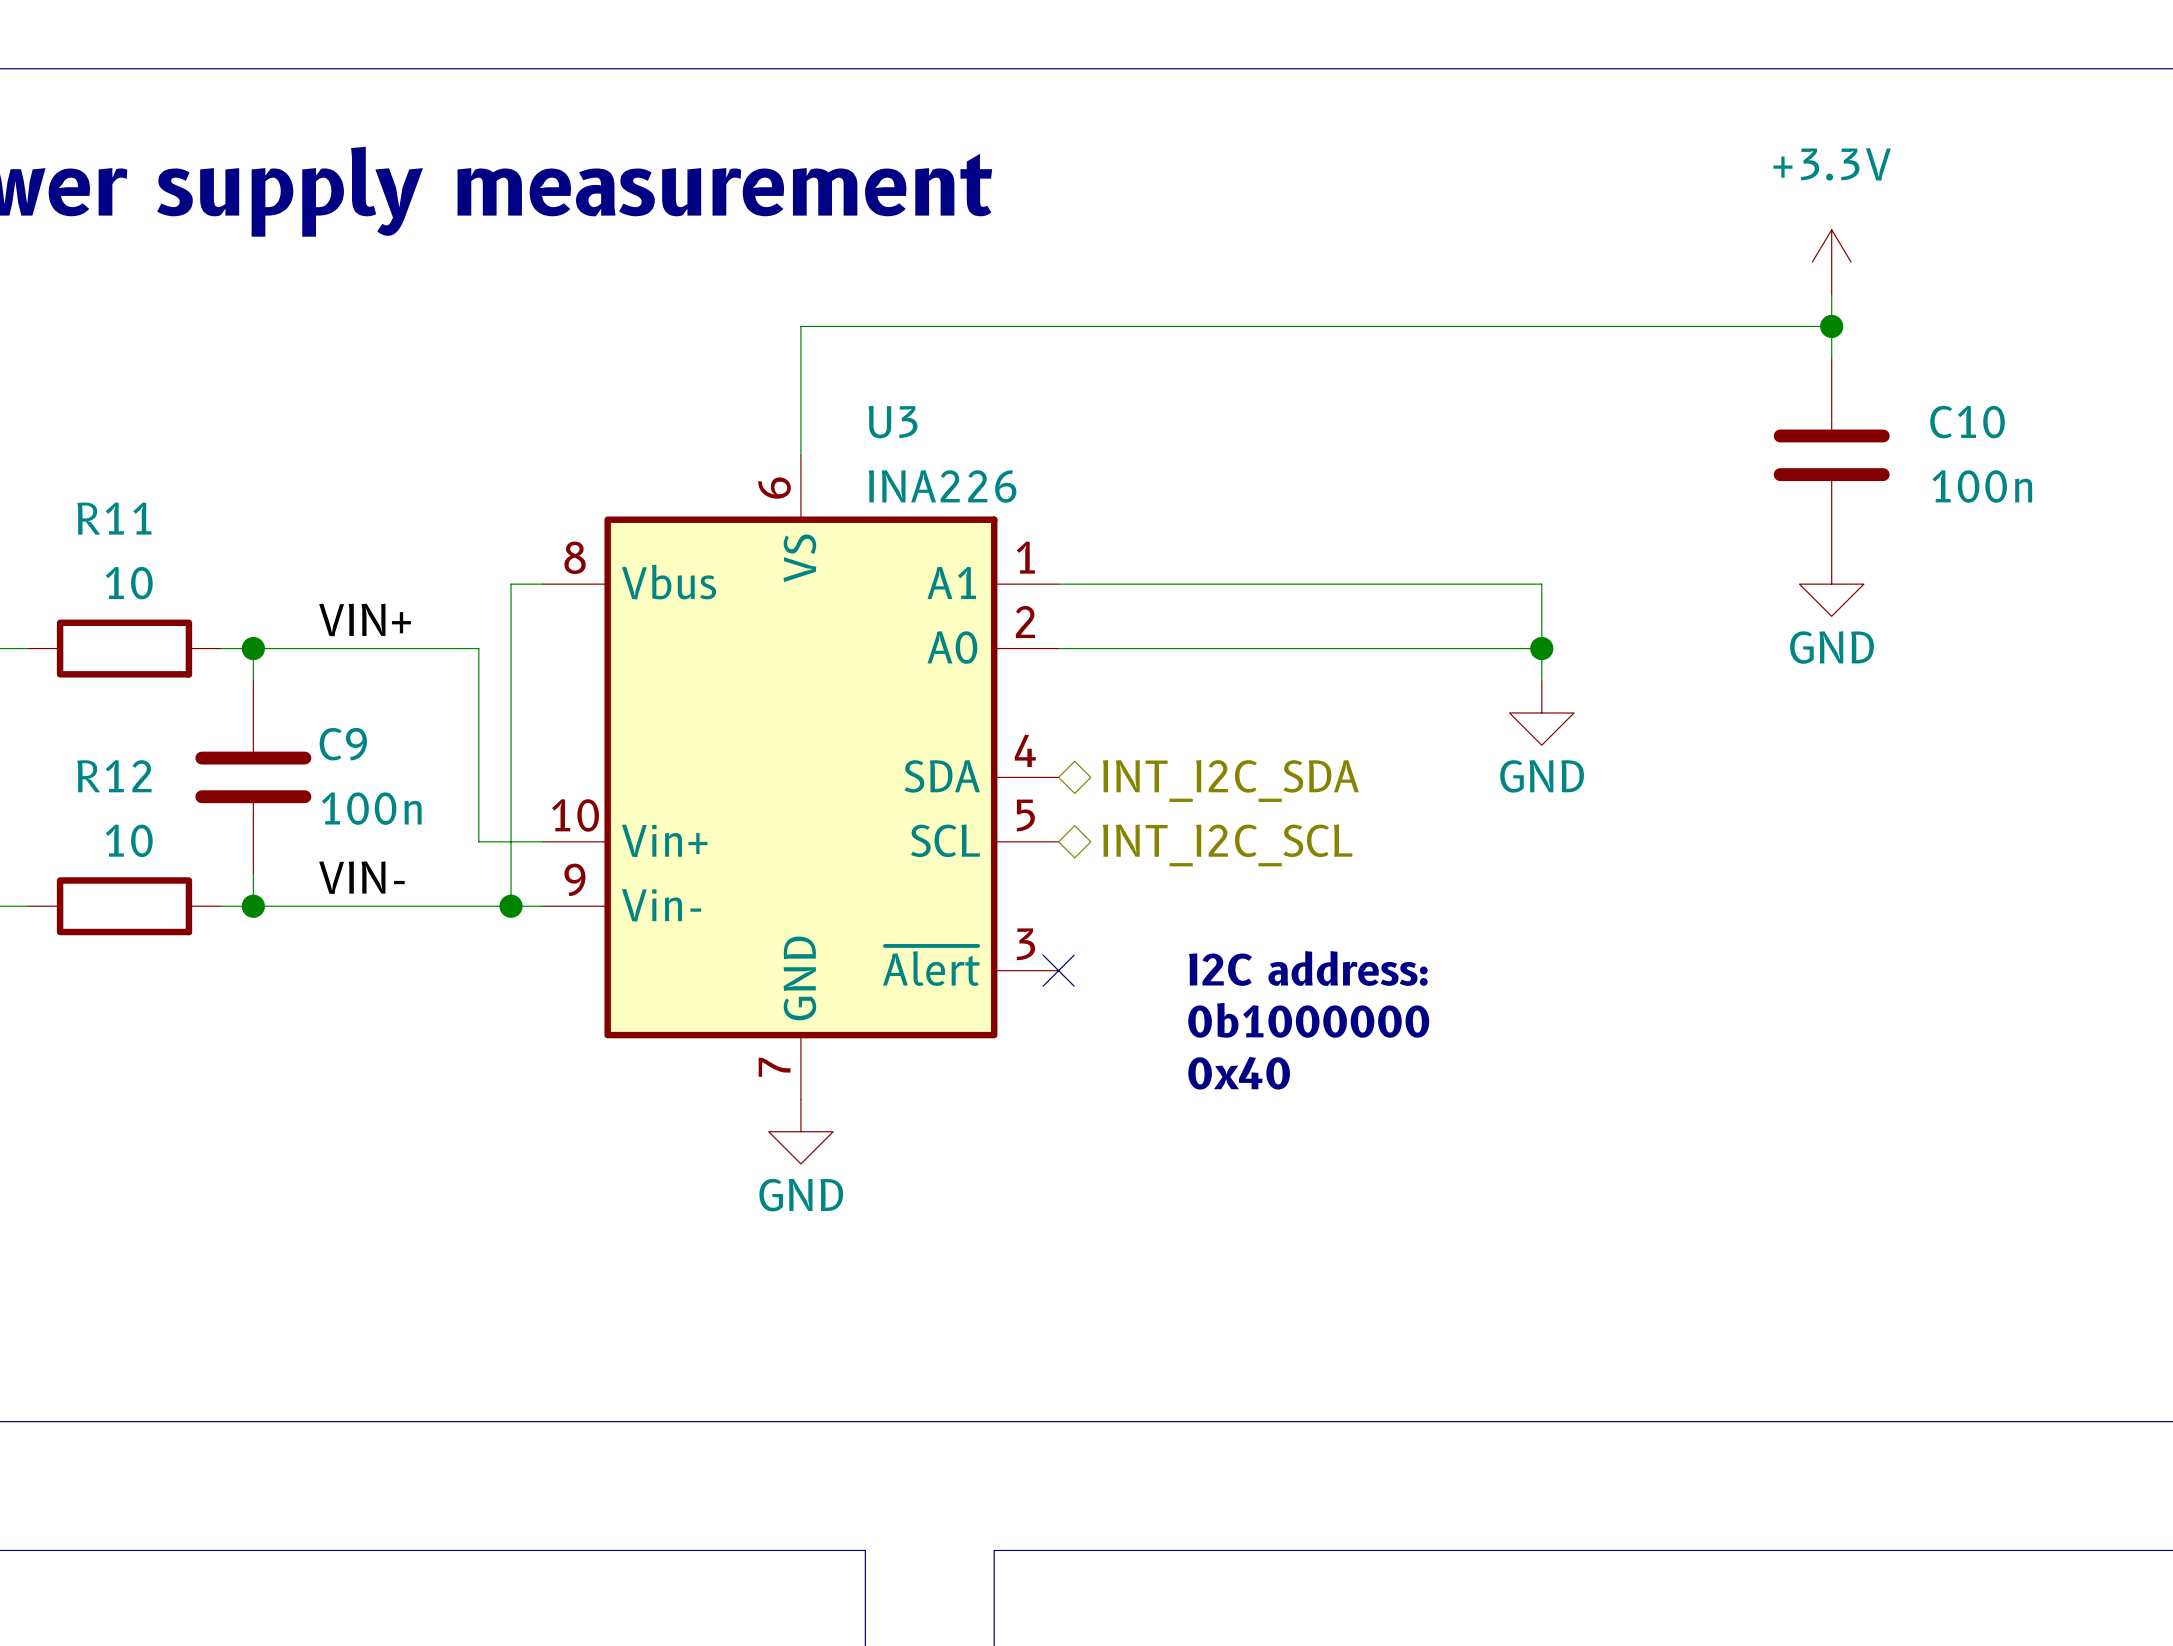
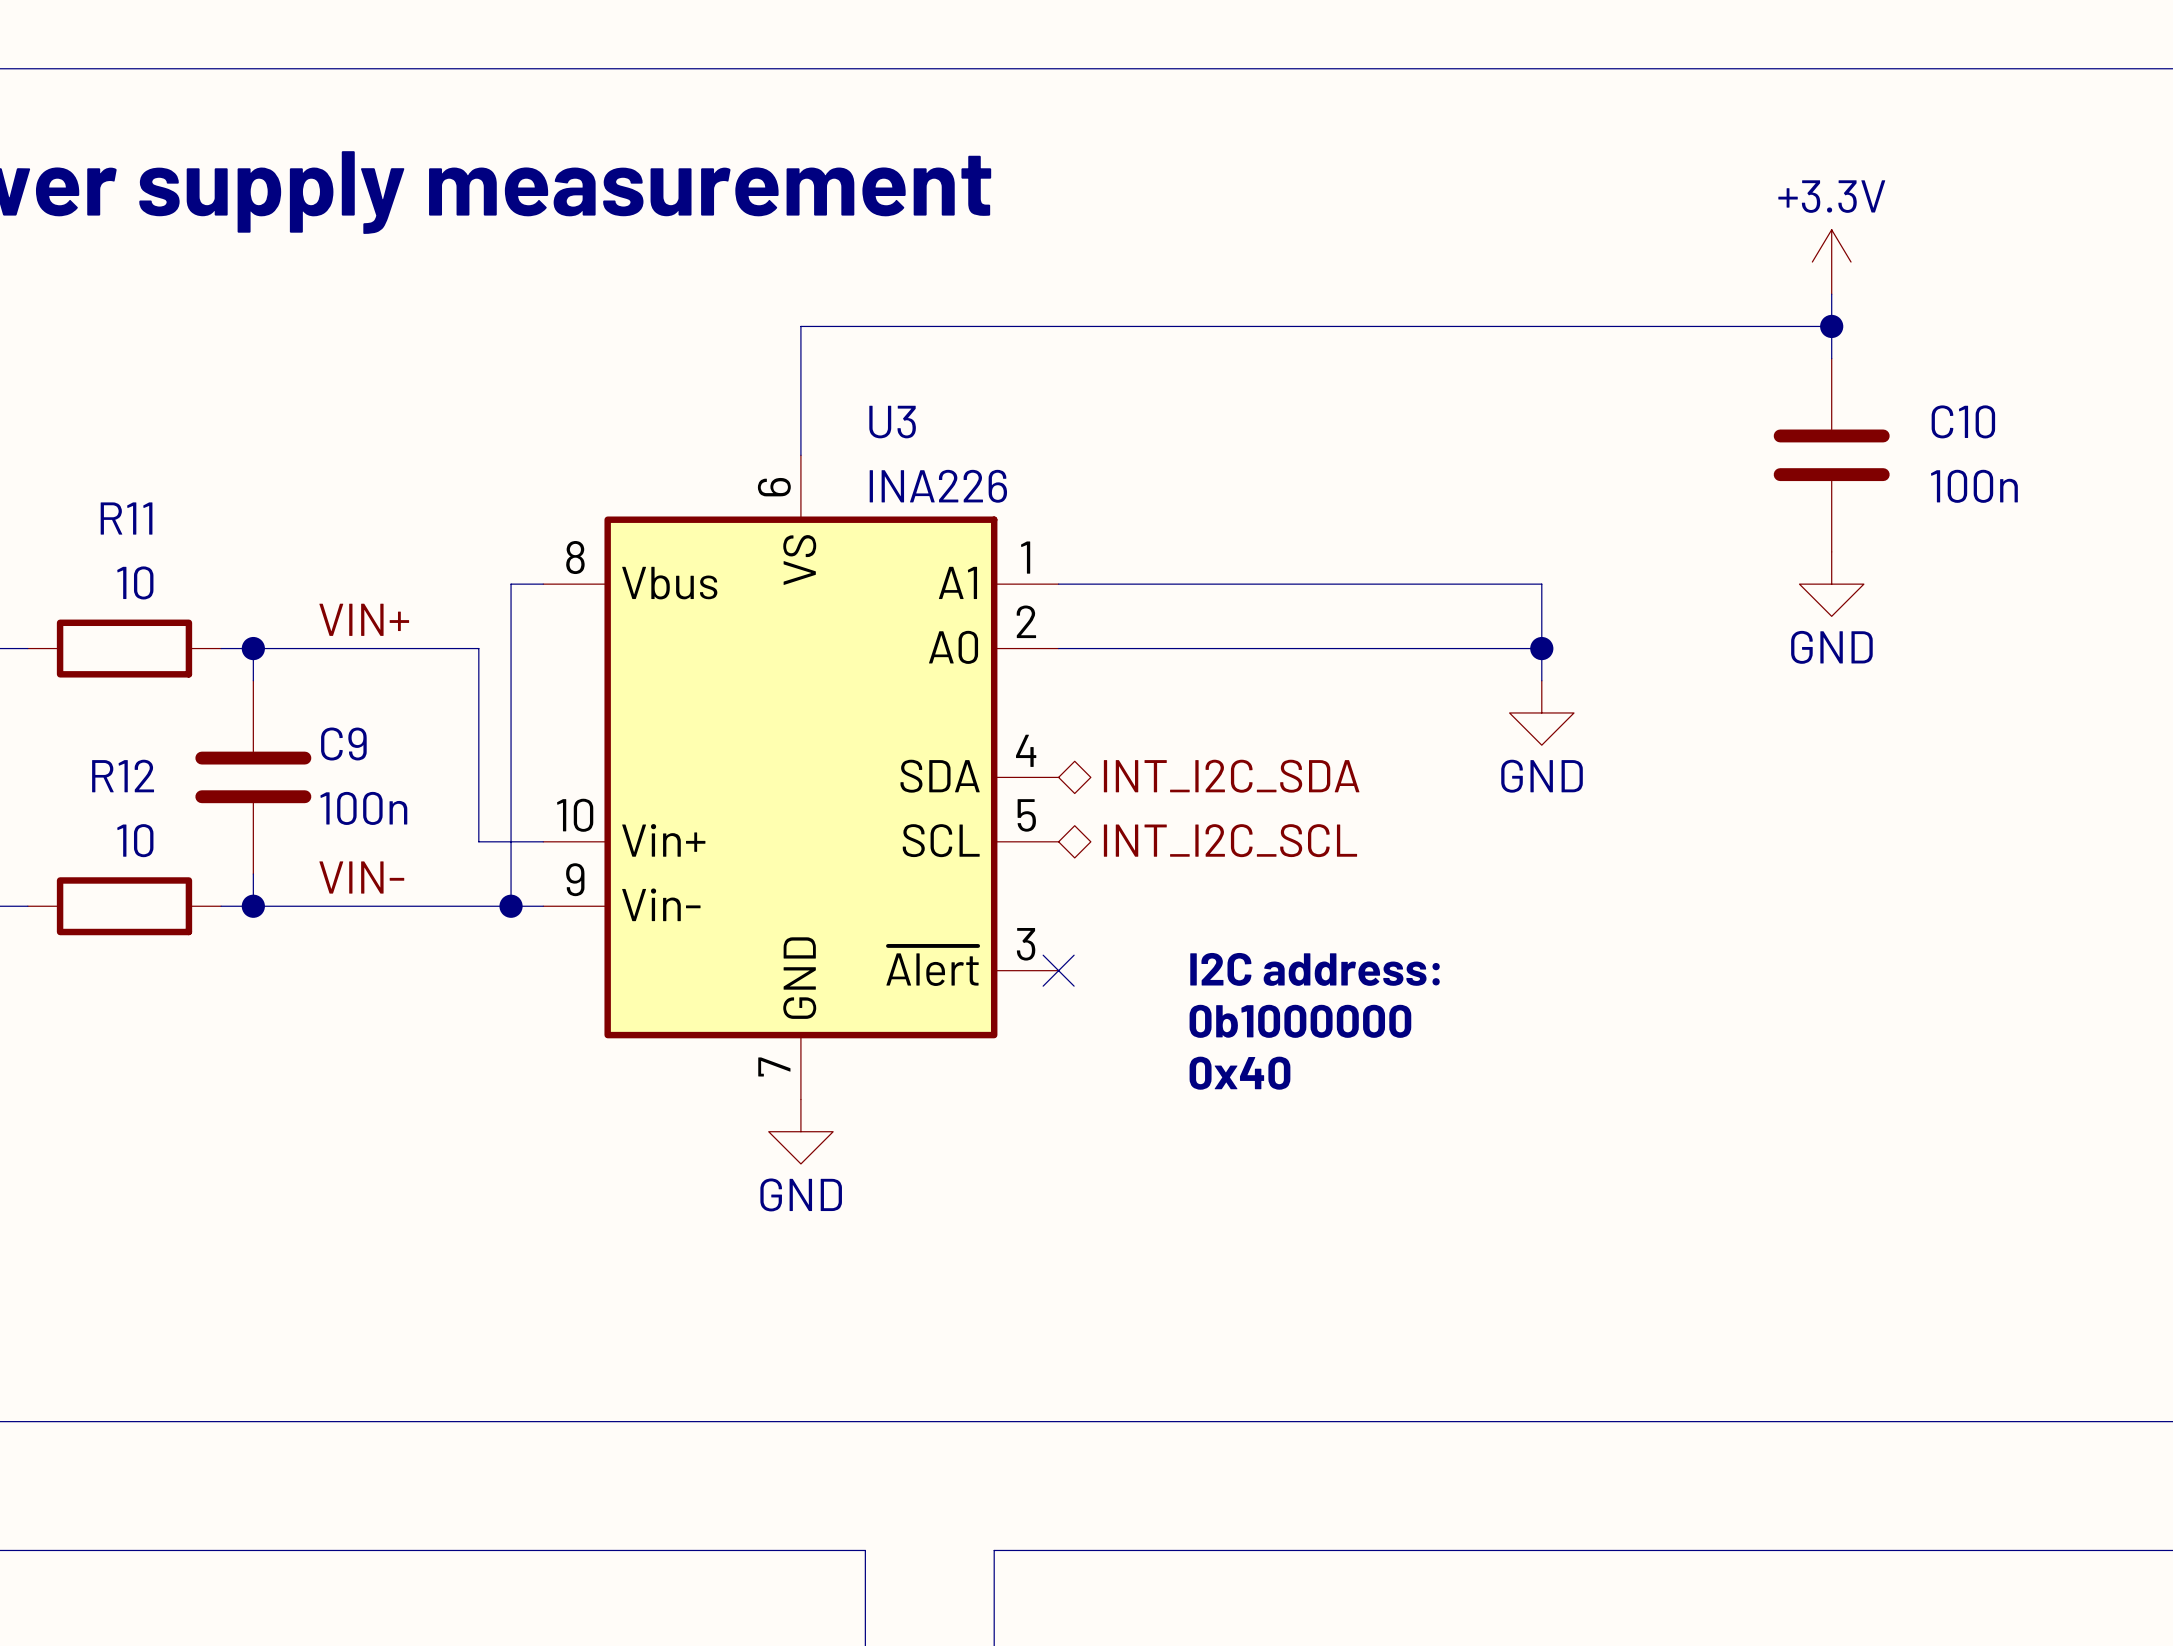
power symbol text position: +3.3V (1832, 164) -> +3.3V (1831, 196)

